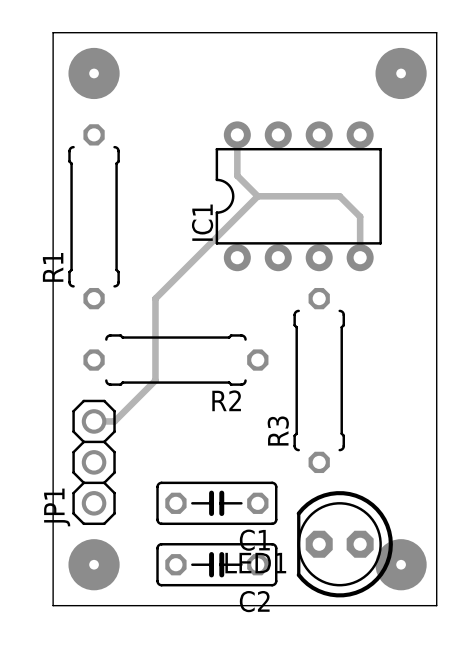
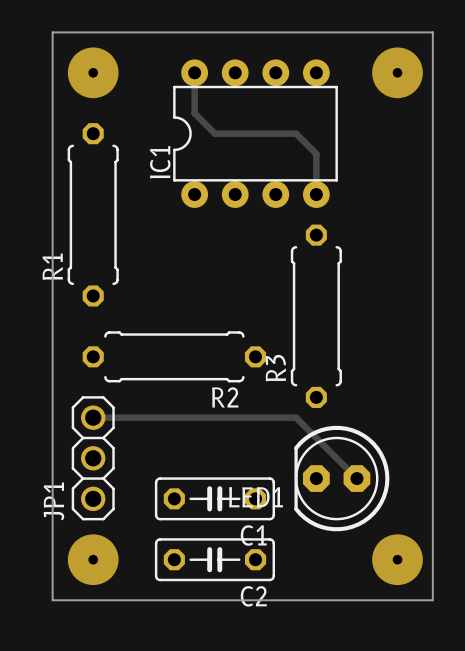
track: none -> (194, 72) (194, 113) (214, 133) (296, 133) (316, 153) (316, 194)
track: (237, 134) (237, 175) (257, 196) -> none
track: (257, 196) (155, 298) (155, 380) (114, 421) -> (356, 478) (296, 417) (113, 417)
track: (257, 196) (339, 196) (360, 216) (360, 257) -> none
IC1 position: (298, 196) -> (255, 133)
R3 position: (319, 380) -> (316, 316)
LED1 position: (344, 544) -> (341, 478)

